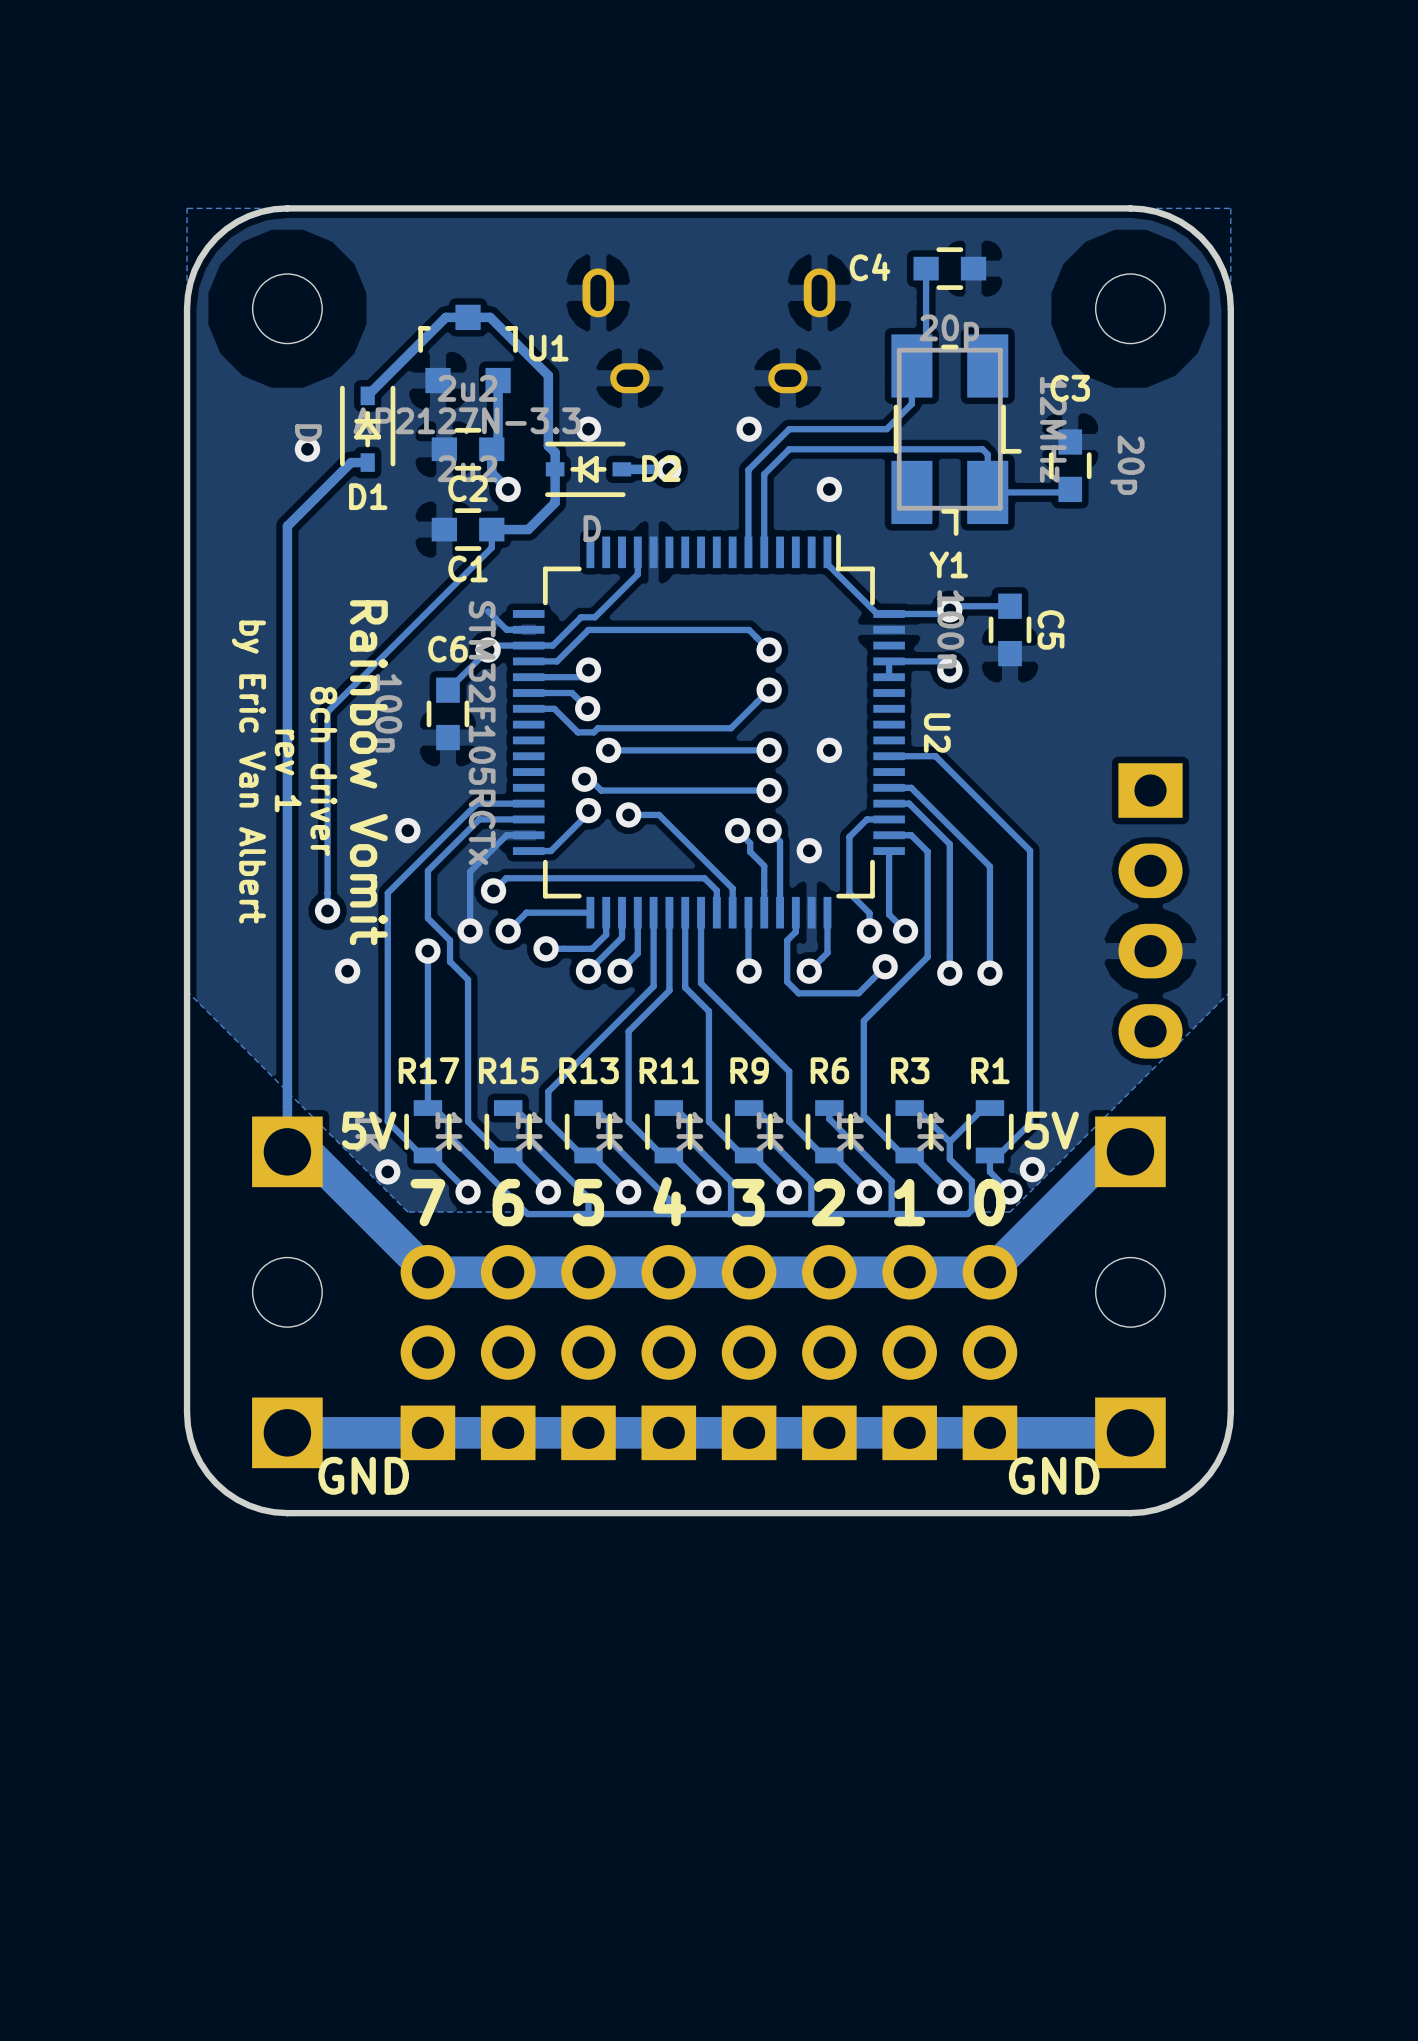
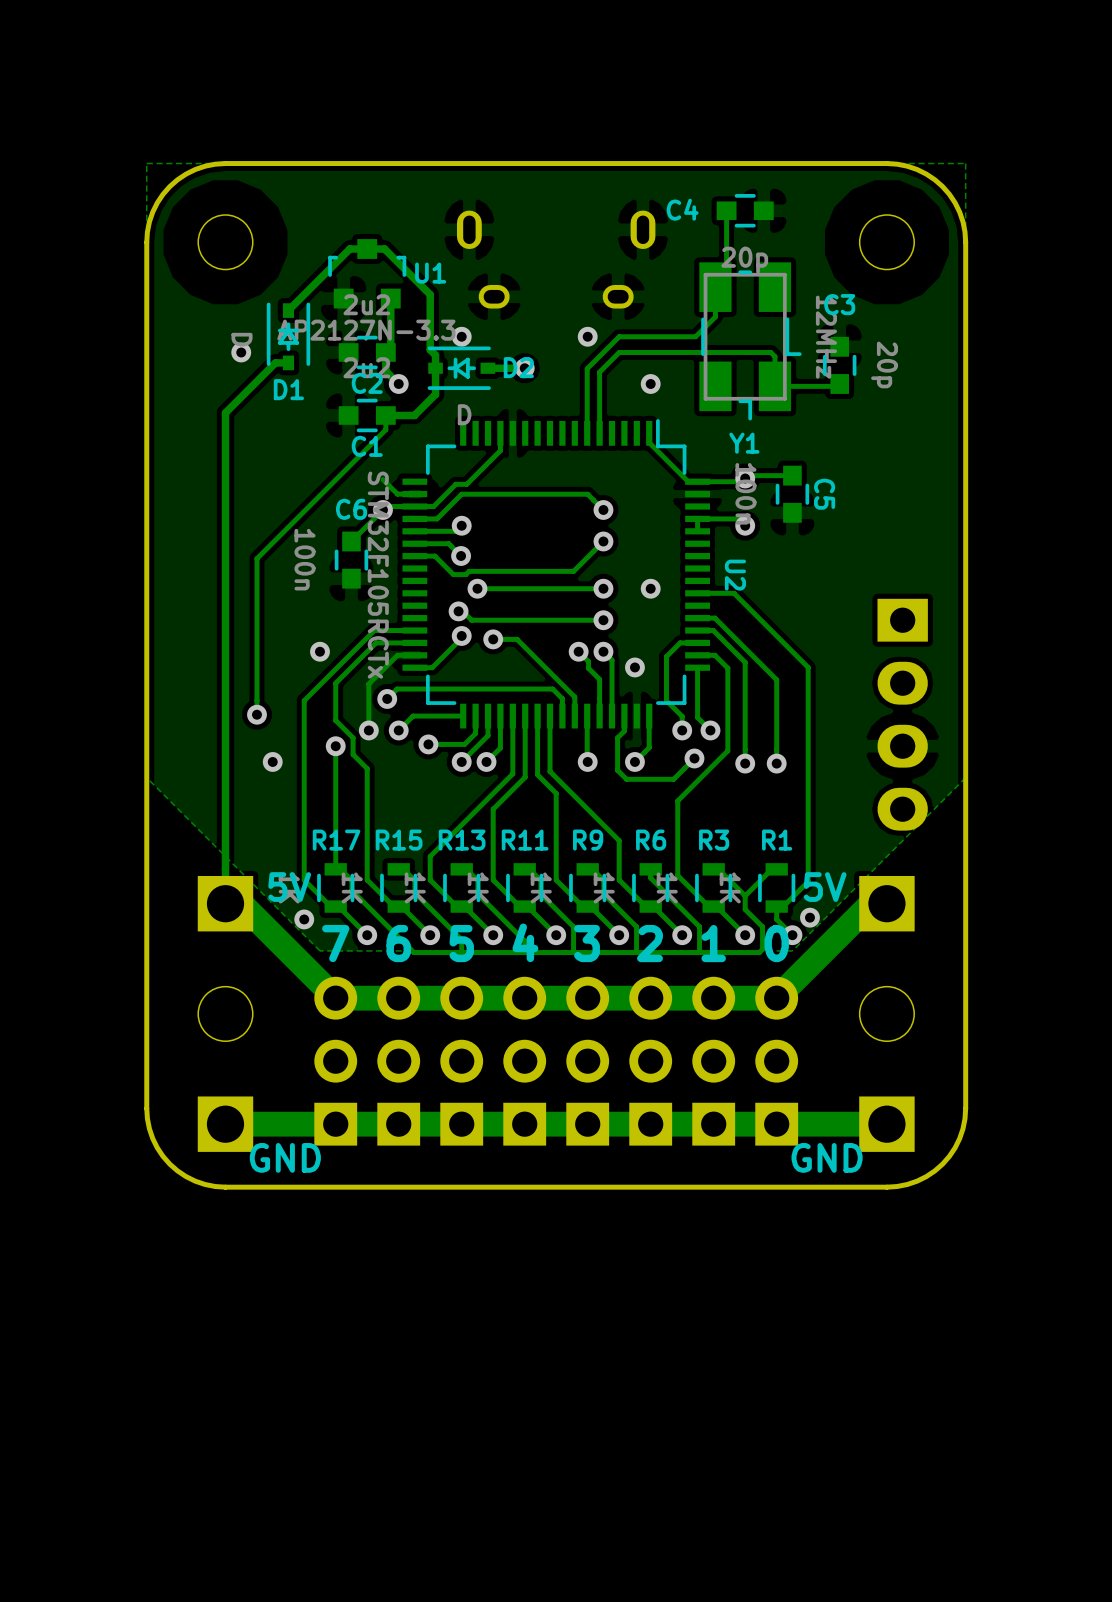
text: rev 1 (288, 770) -> none
text: 8ch driver (323, 771) -> none
text: by Eric Van Albert (248, 772) -> none
text: Rainbow Vomit (368, 772) -> none

